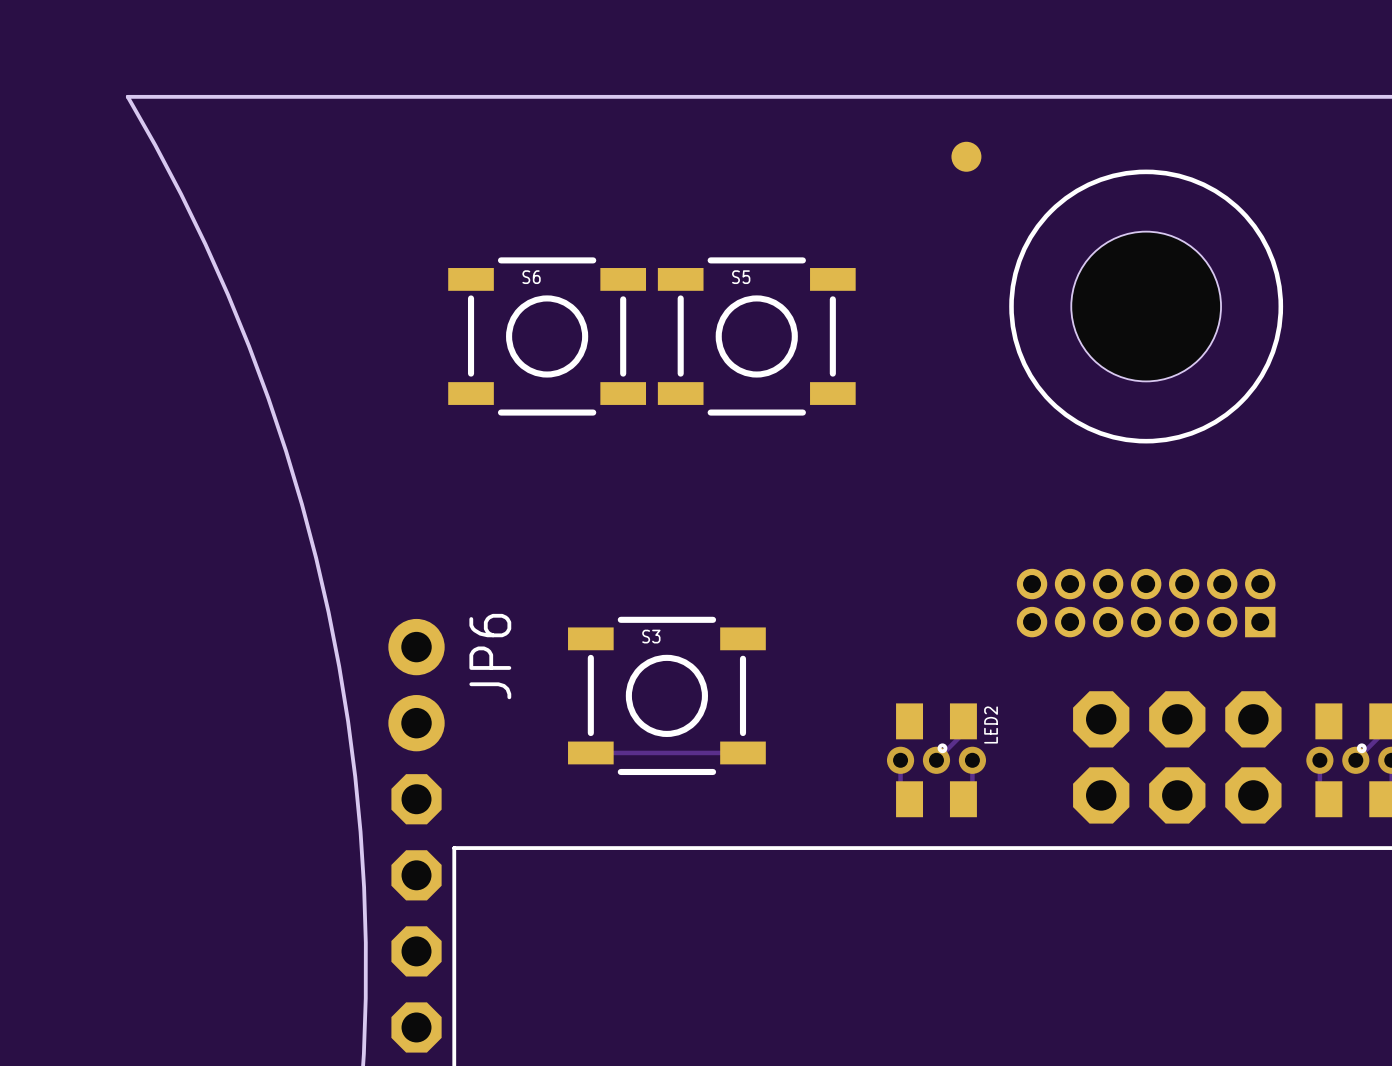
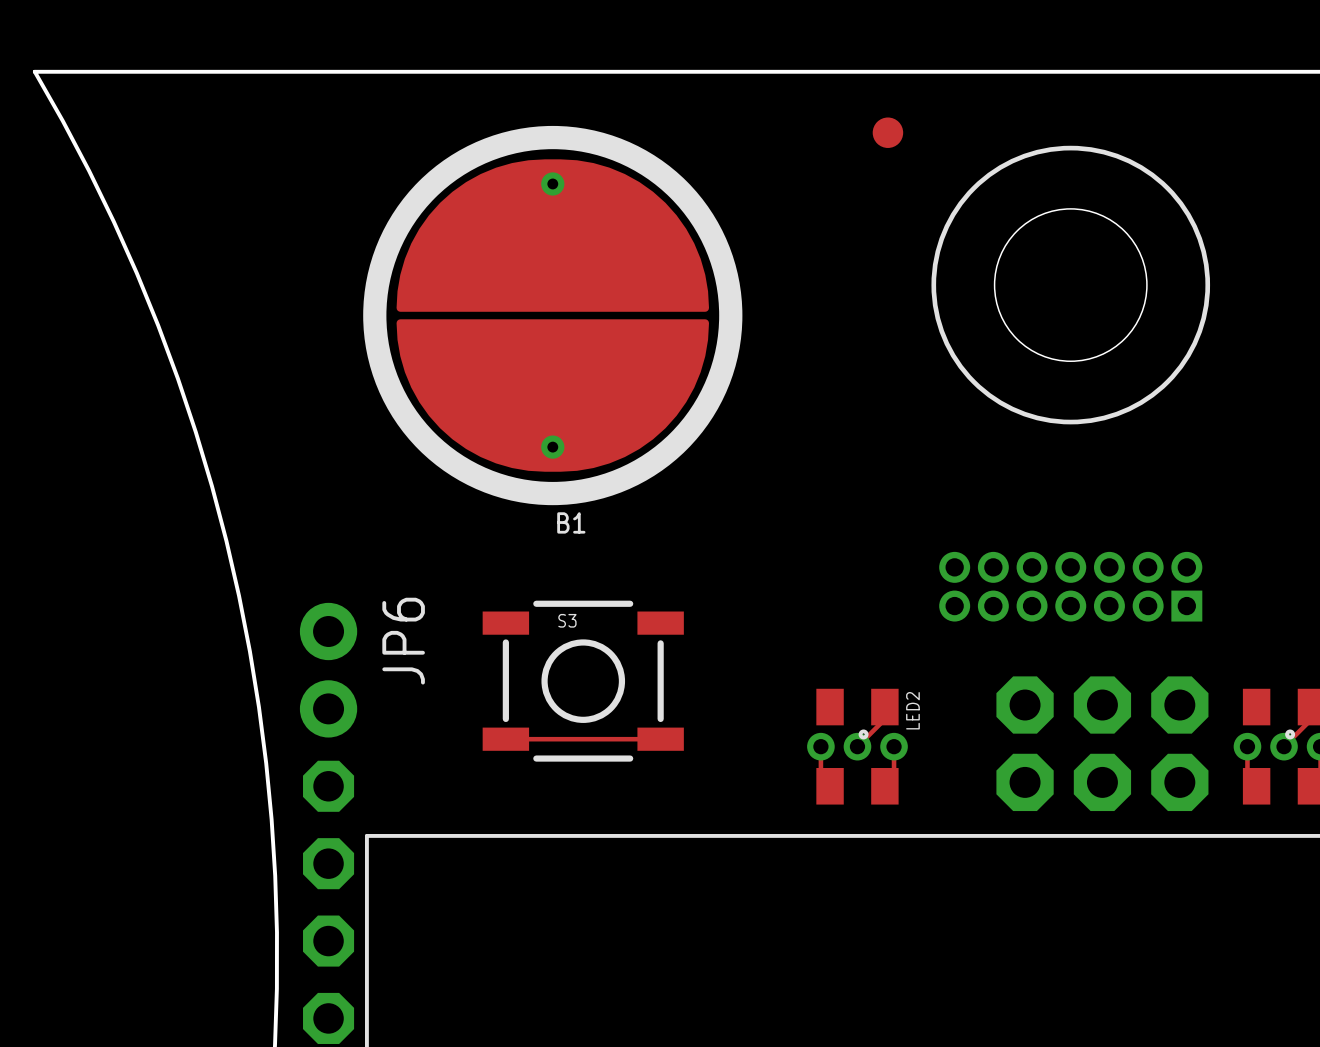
S6: (547, 336) -> none
B1: none -> (552, 315)
S5: (756, 336) -> none

